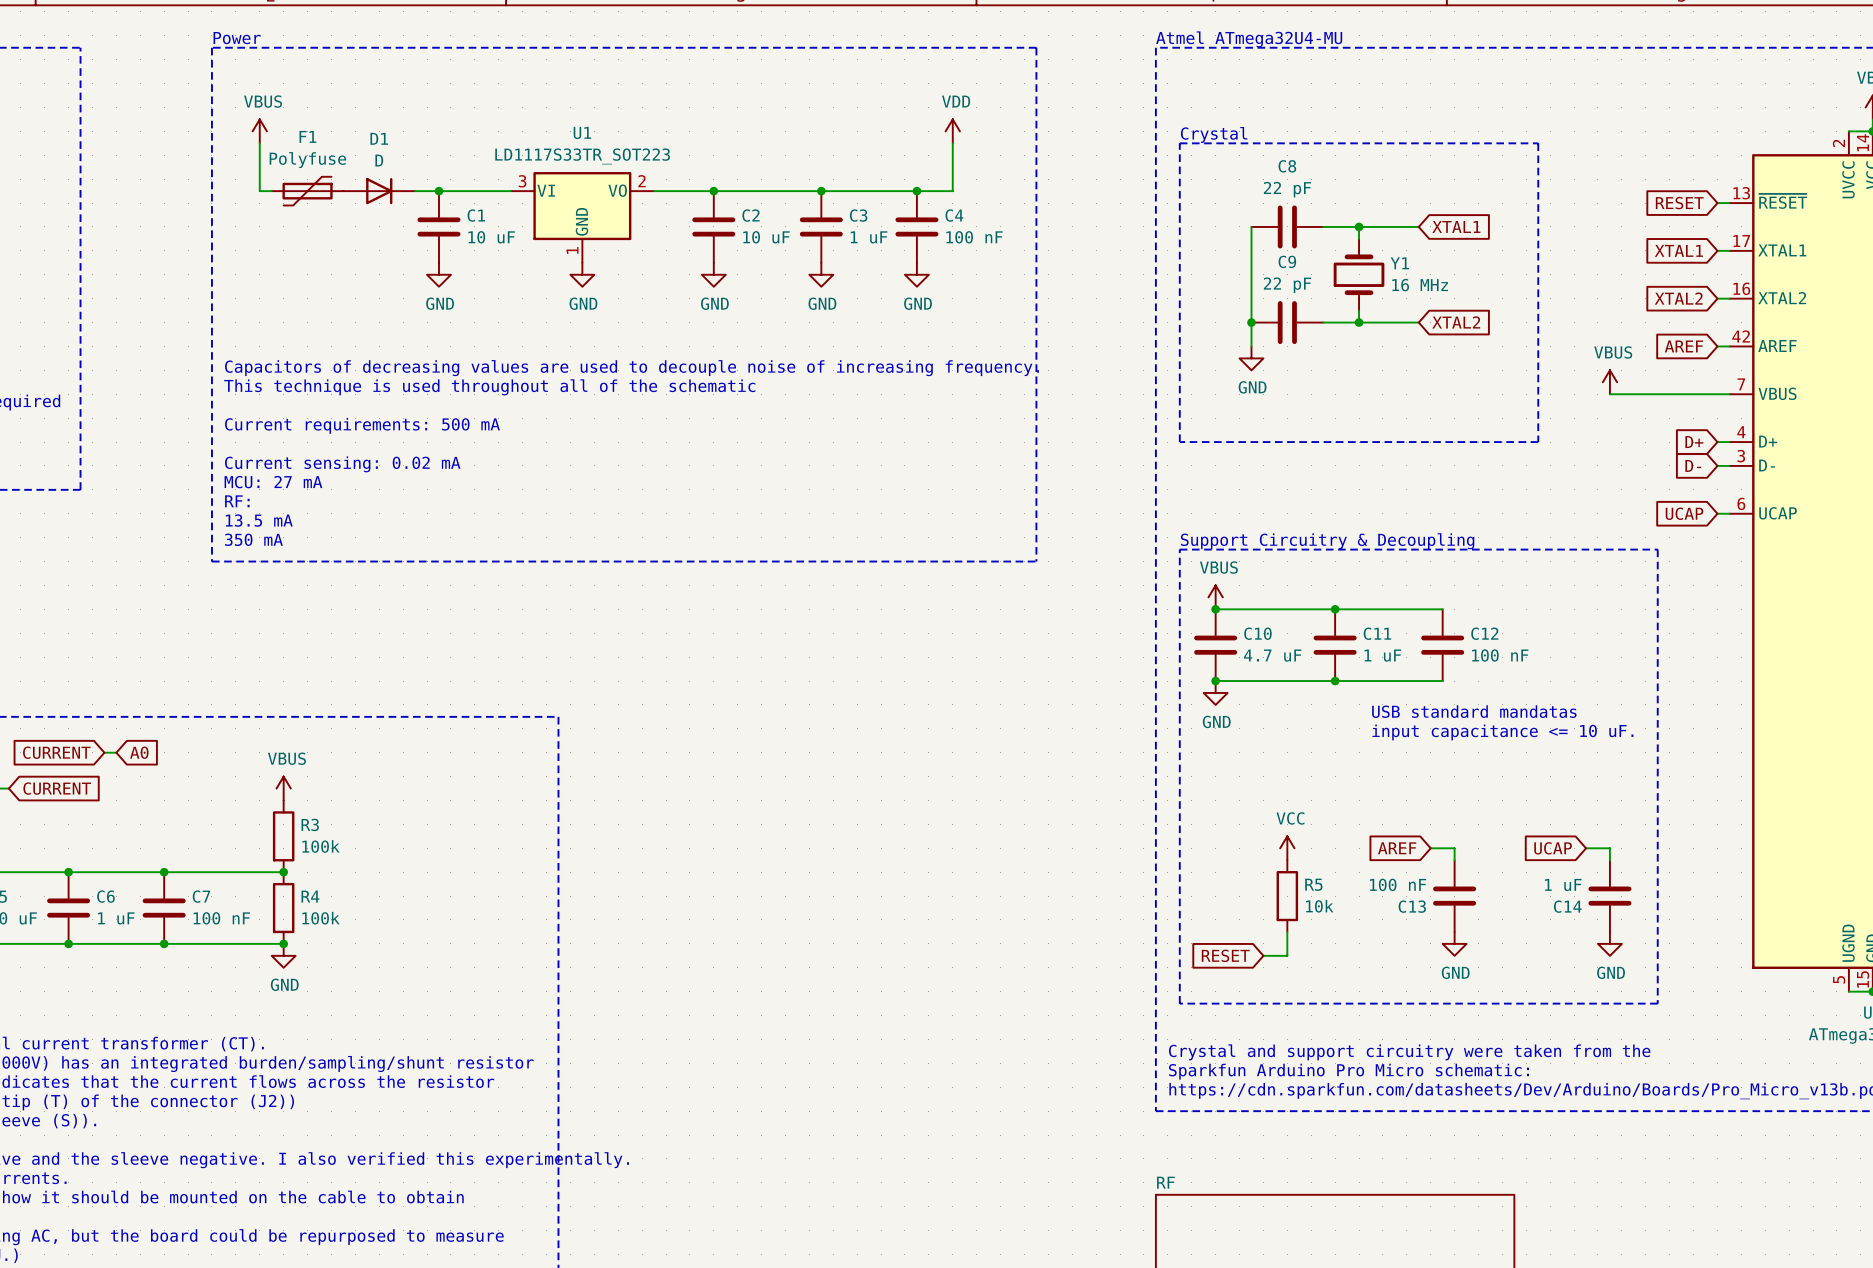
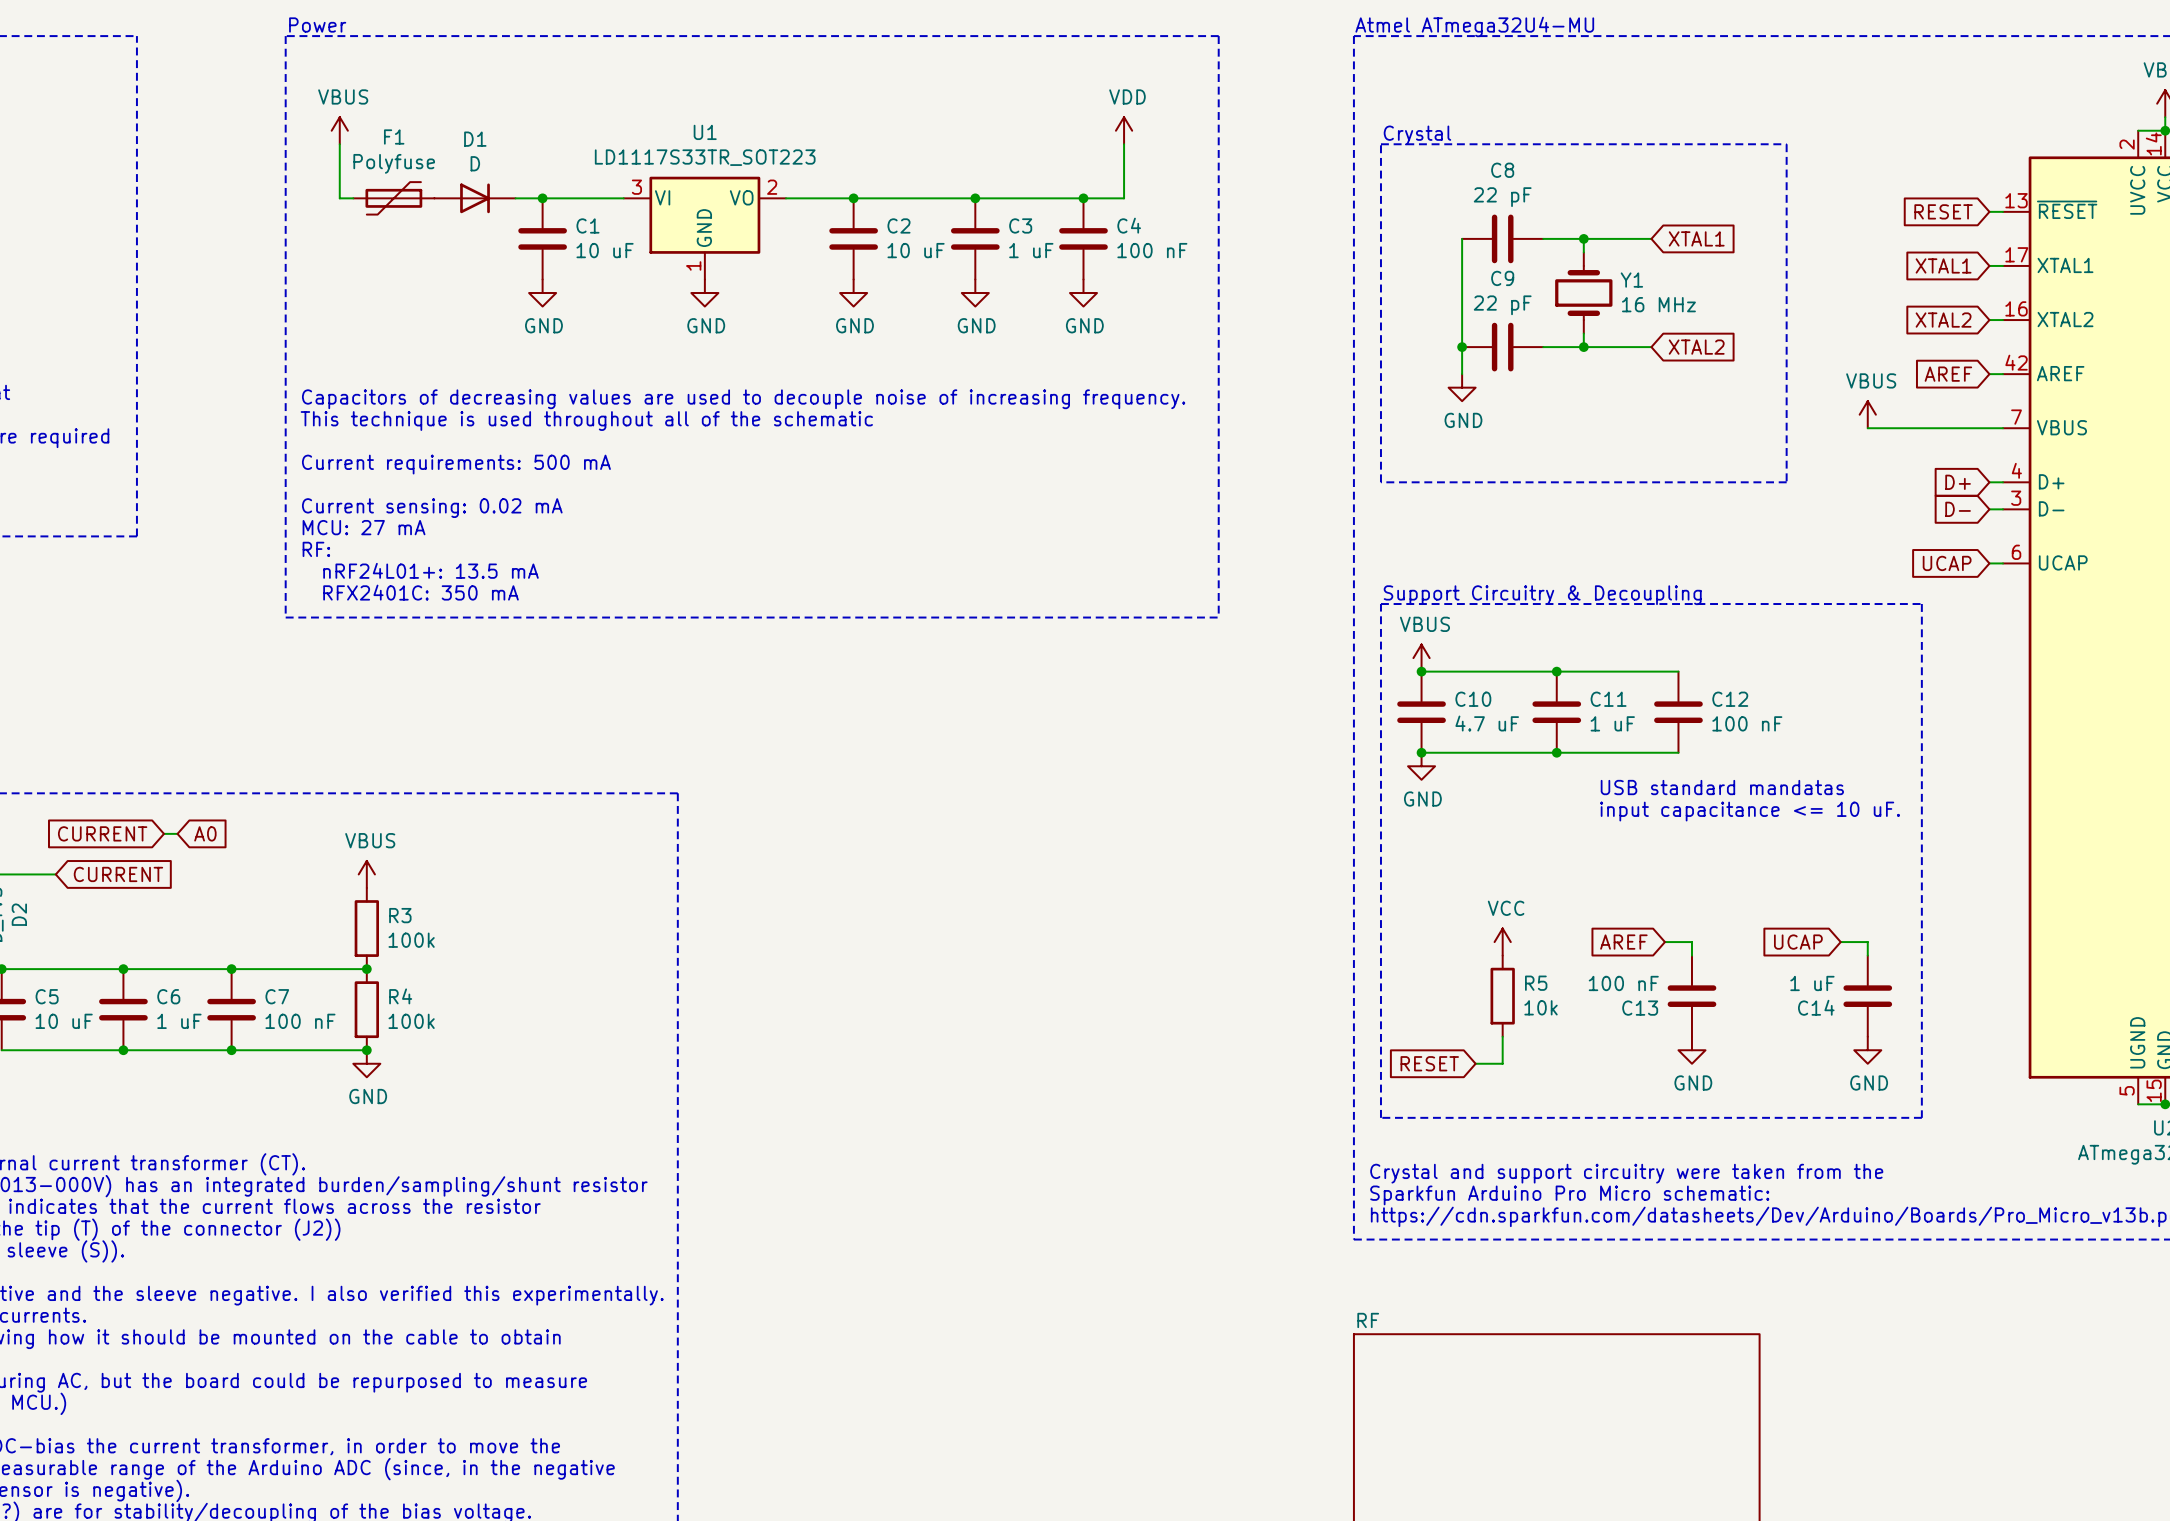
text: 13.5 mA (259, 520) -> nRF24L01+: 13.5 mA (430, 570)
text: 350 mA (253, 539) -> RFX2401C: 350 mA (421, 592)

